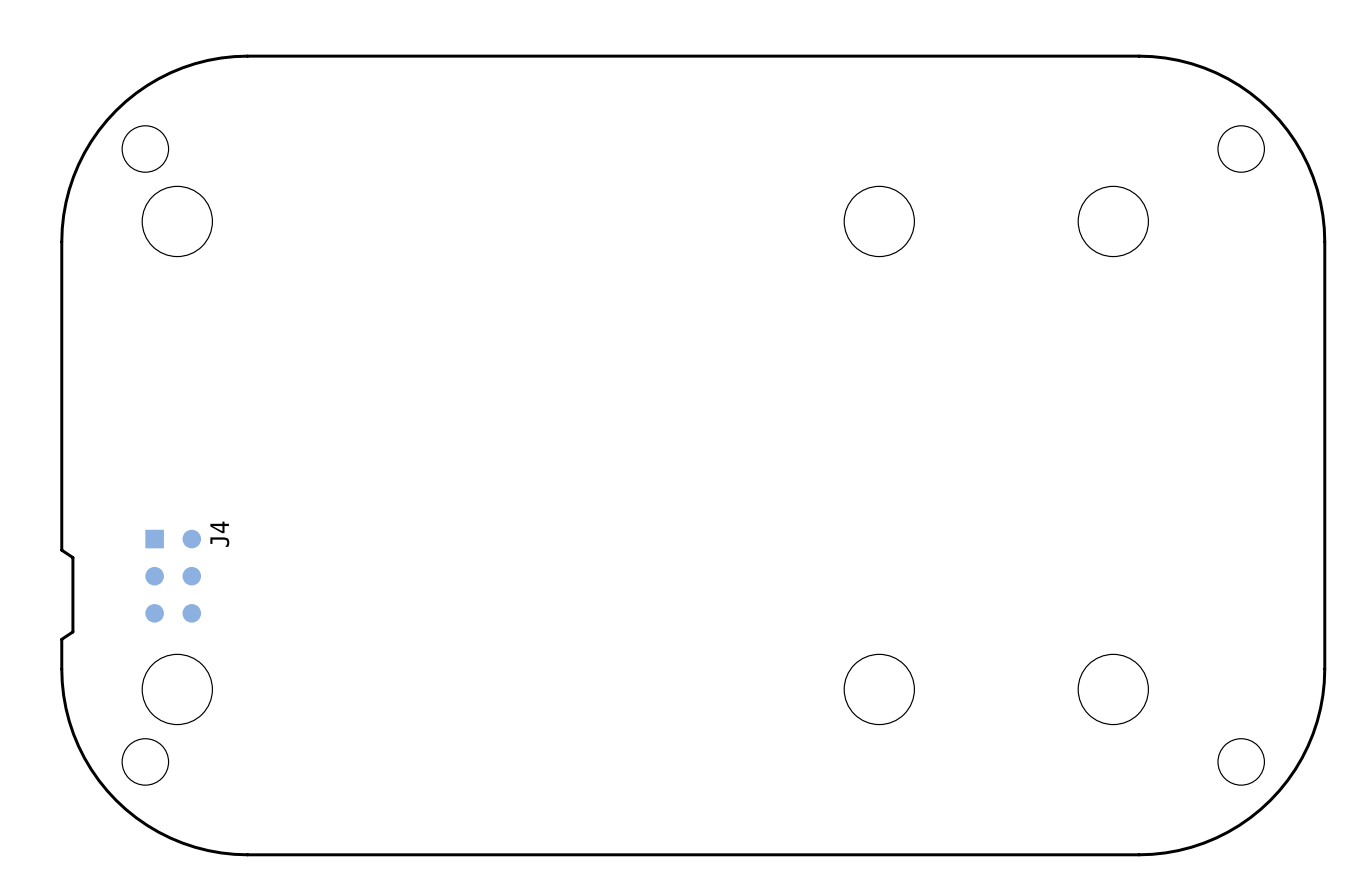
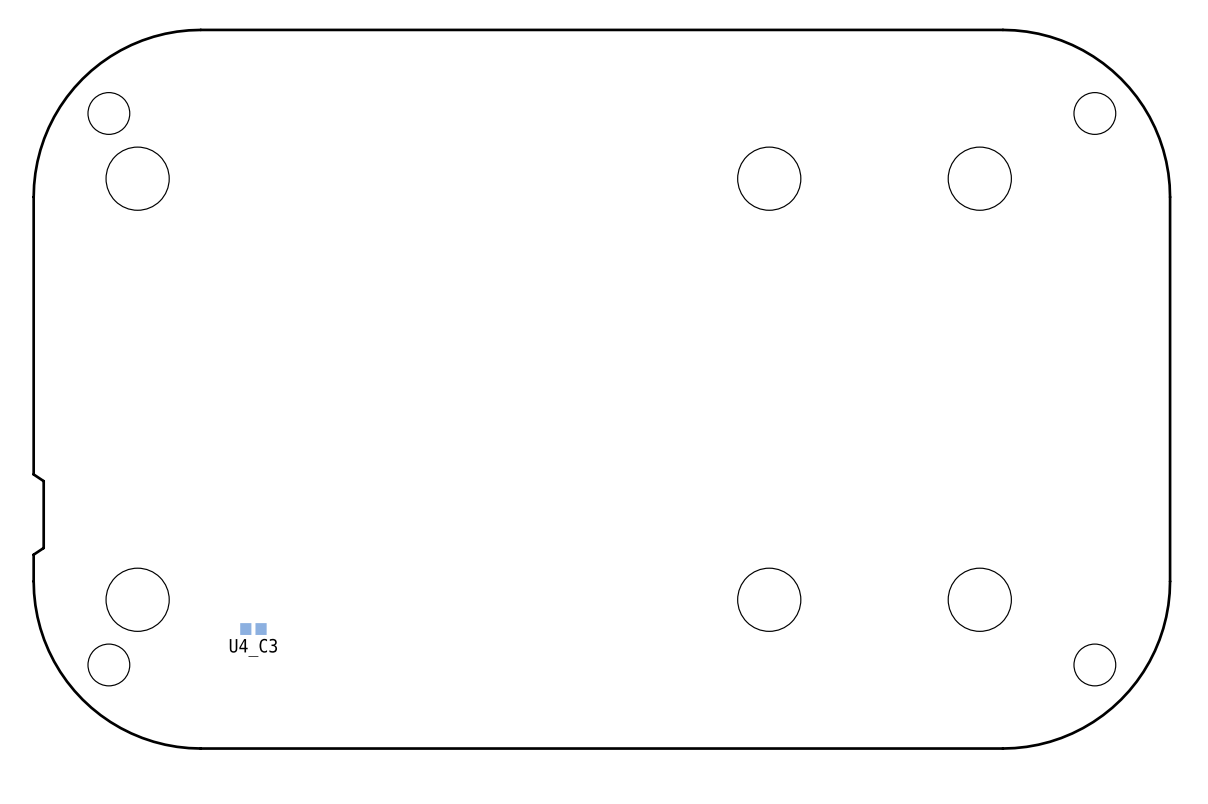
J4: (173, 576) -> none
U4_C3: none -> (253, 629)

